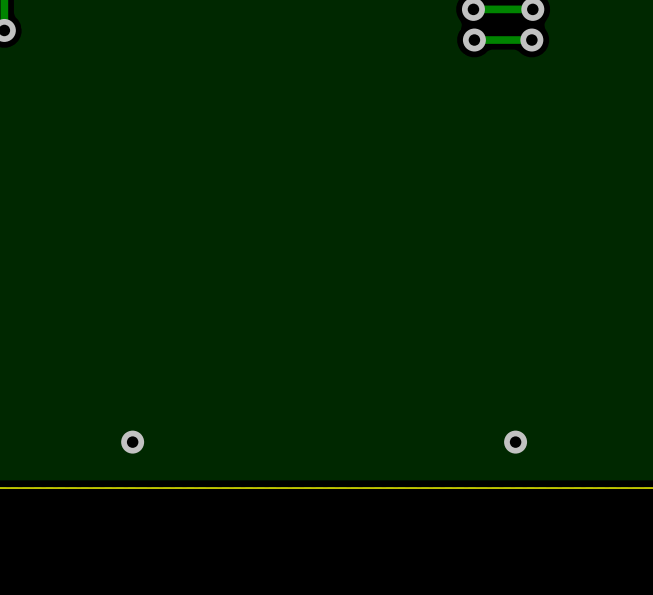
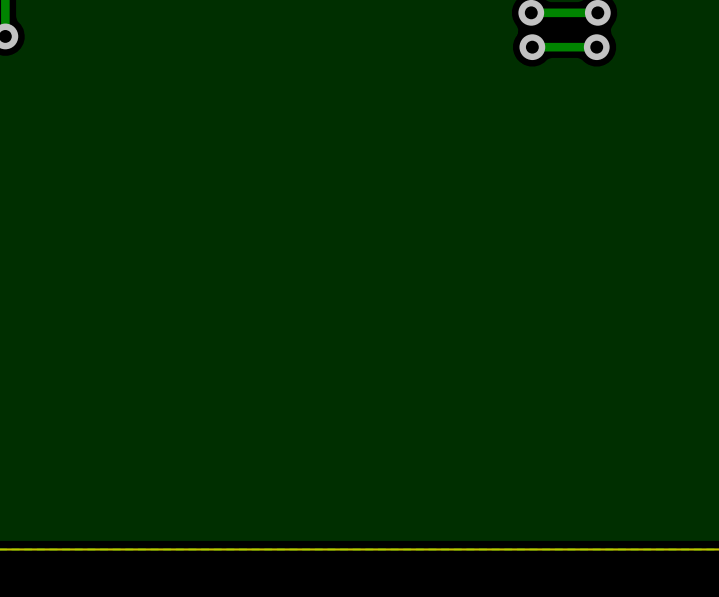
via: (132, 442) -> none
via: (515, 442) -> none

